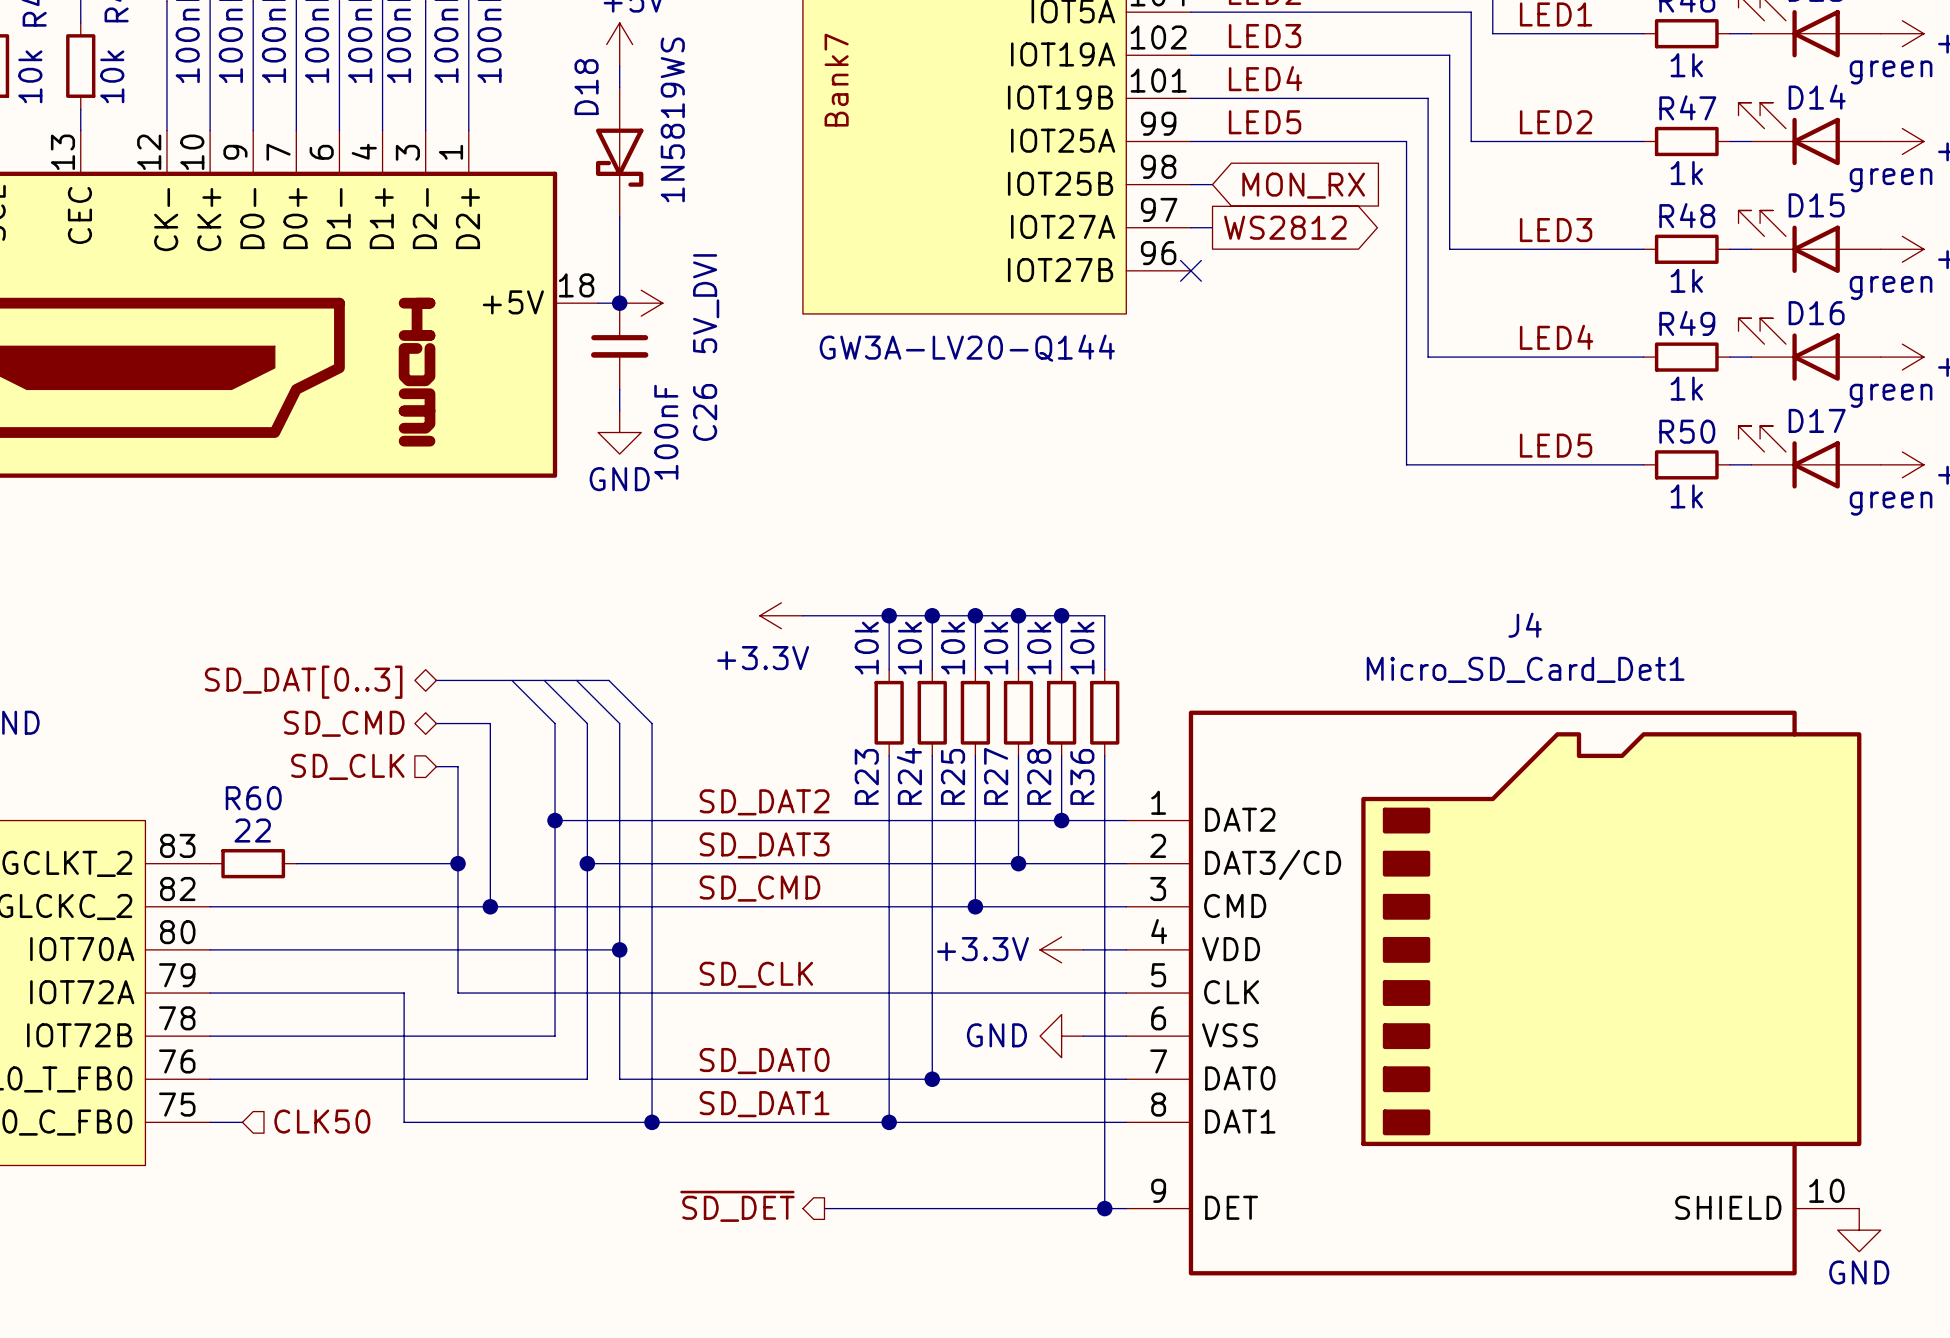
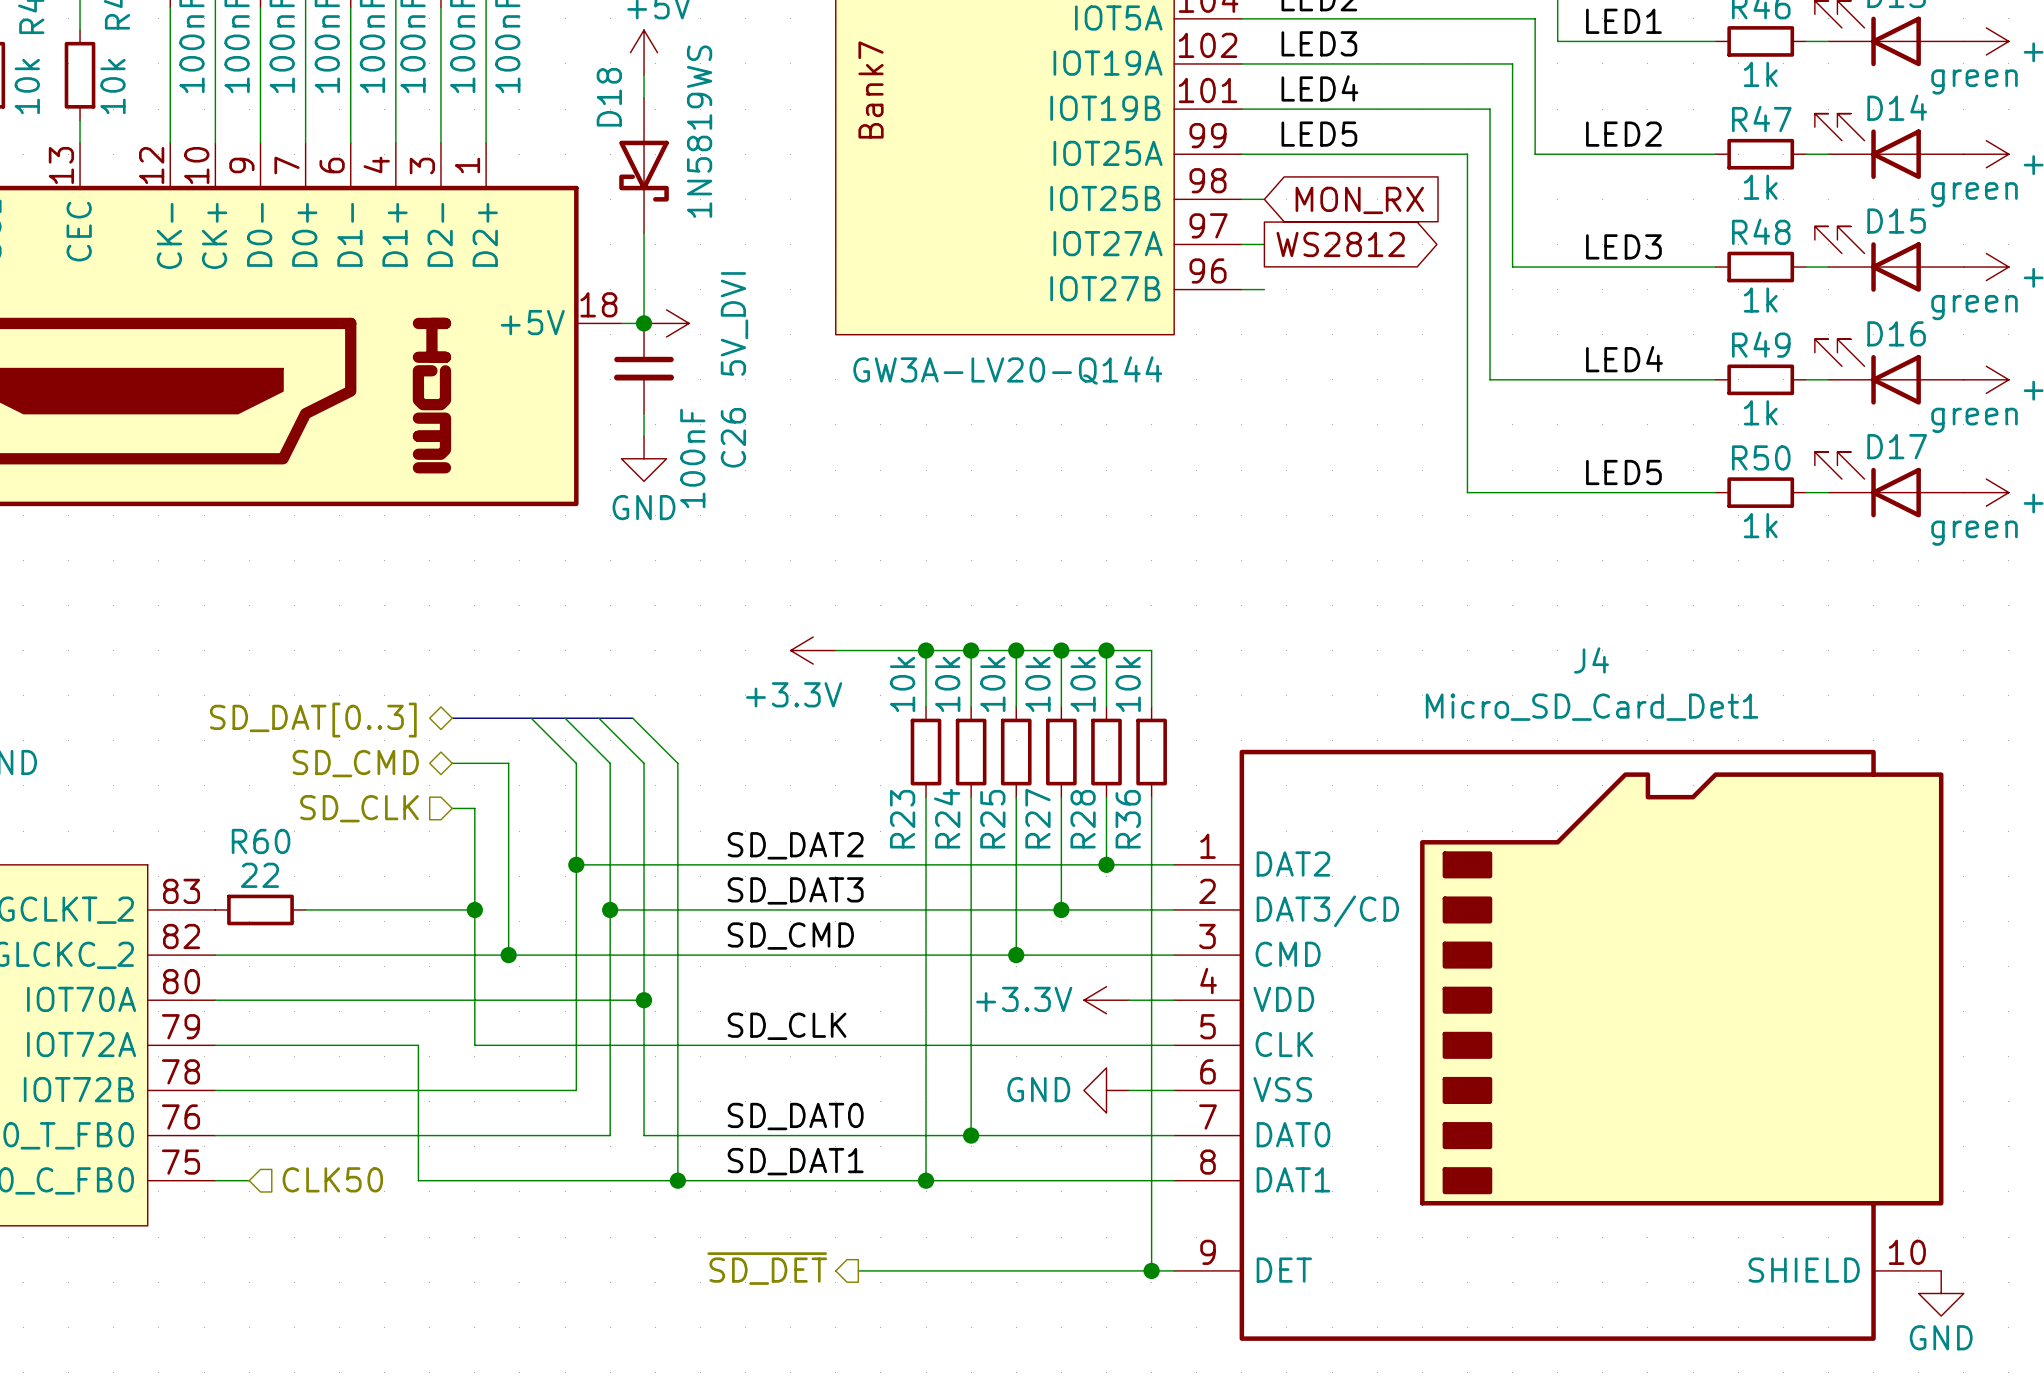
wire: none -> (1241, 289) (1264, 289)
no-connect mark: (1190, 270) -> none

